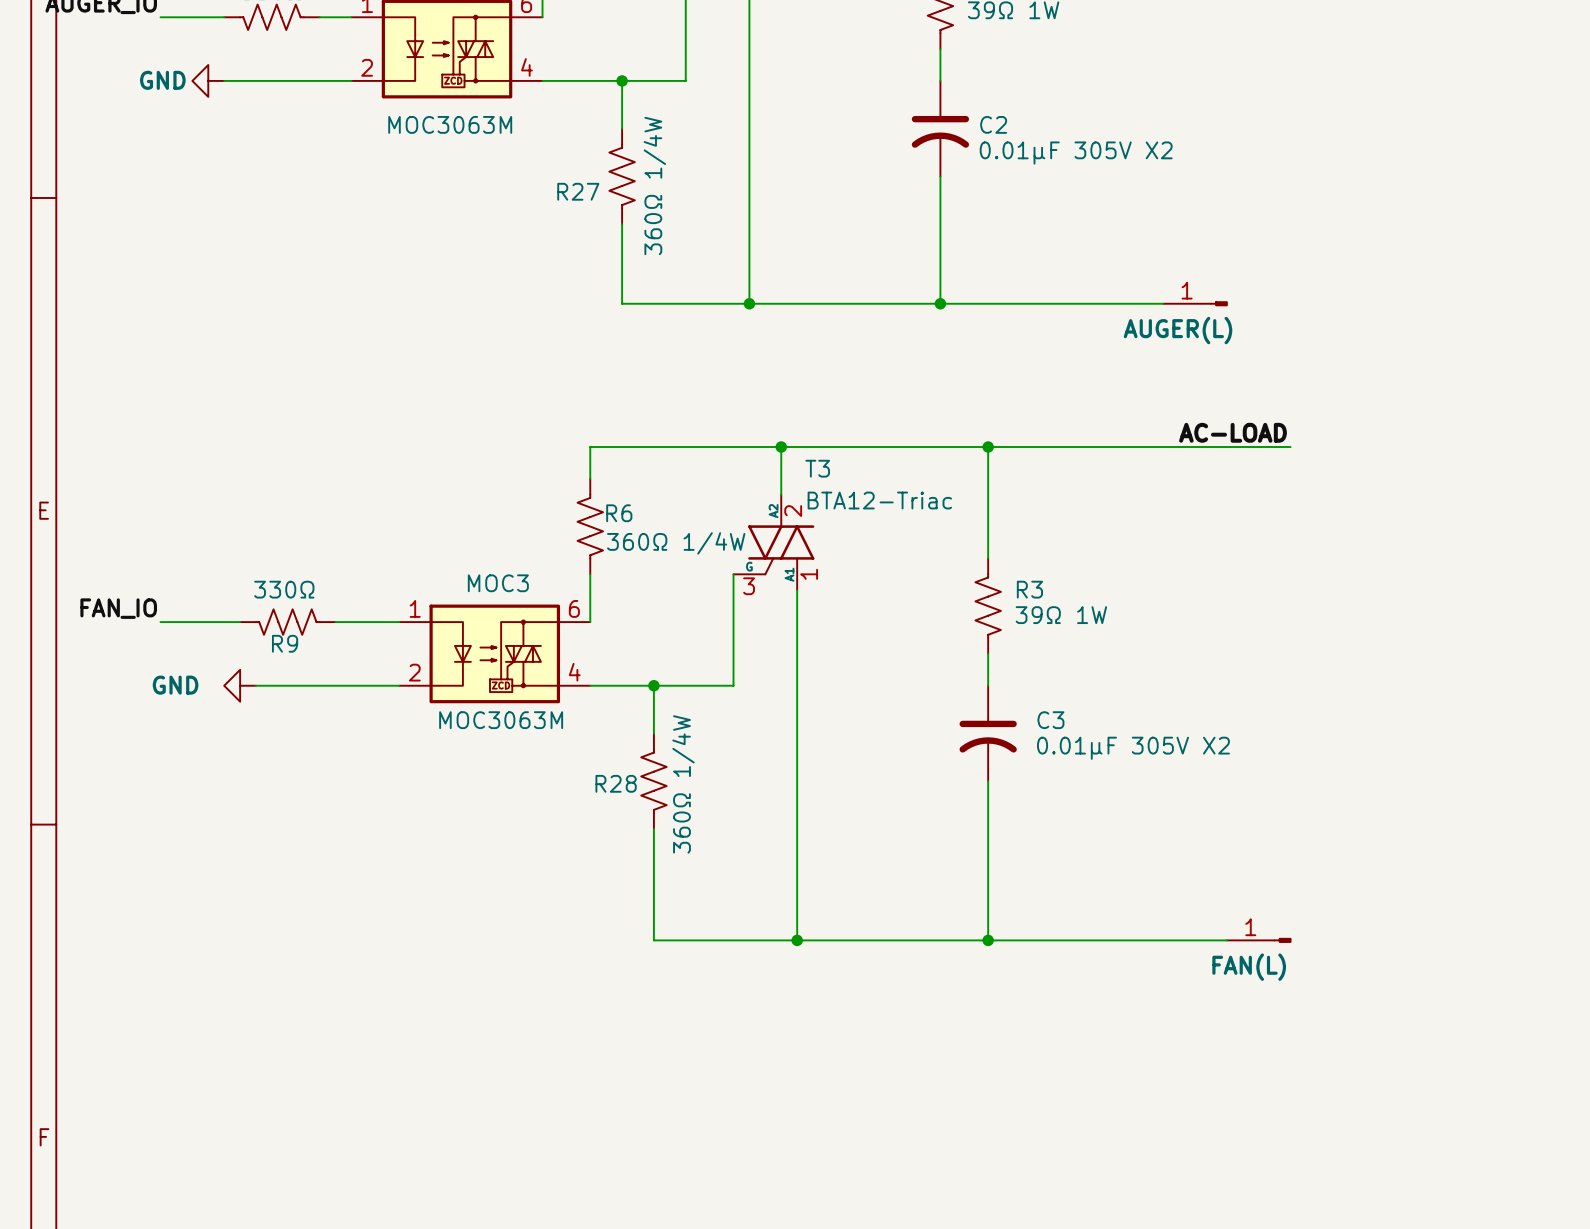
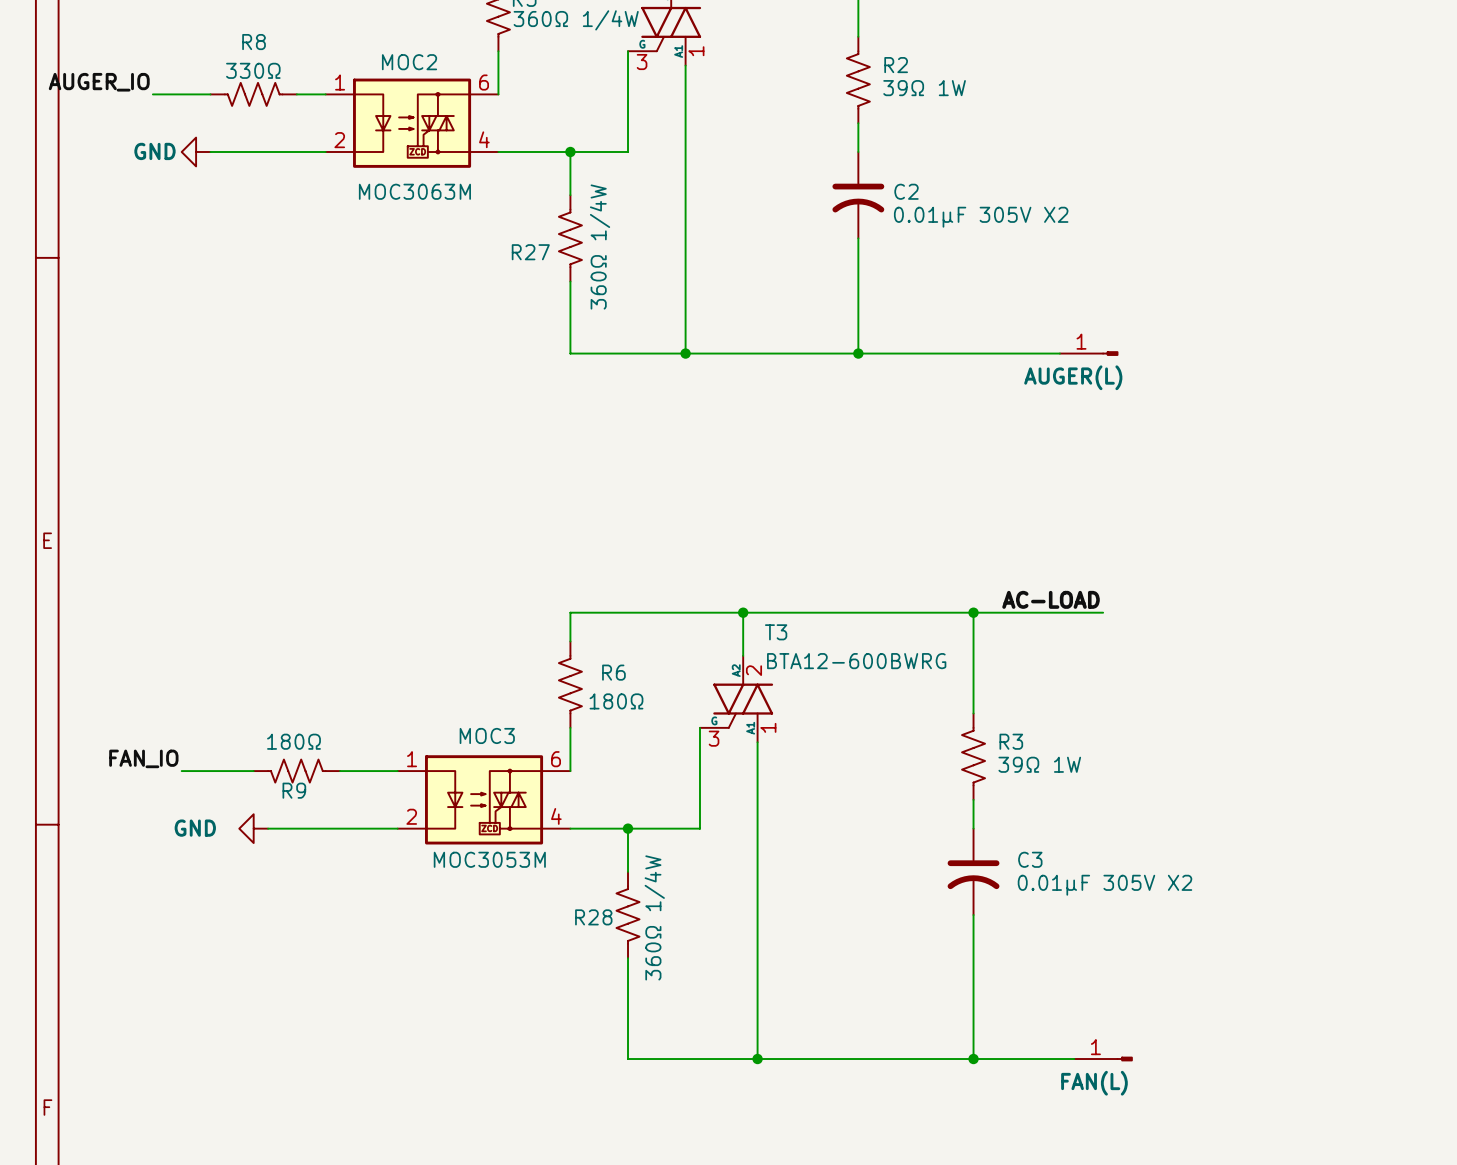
label position: AC-LOAD (1232, 432) -> AC-LOAD (1051, 599)
wire: (781, 447) (781, 494) -> (743, 612) (743, 655)
junction: (781, 447) -> none
wire: (988, 447) (988, 558) -> (973, 612) (973, 713)
junction: (988, 447) -> none
wire: (1290, 447) (590, 447) (590, 478) -> none
T3 value: BTA12-Triac (879, 500) -> BTA12-600BWRG (856, 661)
R6 name position: R6 (619, 513) -> R6 (613, 672)
R6 position: (590, 526) -> (570, 684)
T3 position: (773, 542) -> (736, 699)
R6 value: 360Ω 1/4W (676, 543) -> 180Ω (616, 701)
wire: (590, 574) (590, 622) -> (570, 727) (570, 771)
wire: (733, 574) (733, 685) (590, 685) -> (699, 727) (699, 828) (570, 828)
R9 value: 330Ω (284, 589) -> 180Ω (293, 741)
wire: (797, 590) (797, 940) -> (757, 742) (757, 1059)
junction: none -> (743, 612)
junction: none -> (973, 612)
wire: none -> (1103, 612) (570, 612) (570, 641)
R3 position: (988, 606) -> (973, 756)
label position: FAN_IO (118, 608) -> FAN_IO (143, 758)
wire: (160, 622) (240, 622) -> (181, 771) (253, 771)
R9 position: (287, 622) -> (296, 771)
wire: (335, 622) (399, 622) -> (340, 771) (397, 771)
MOC3 position: (494, 653) -> (484, 799)
wire: (988, 653) (988, 685) -> (973, 799) (973, 828)
power symbol position: GND (240, 685) -> GND (253, 828)
wire: (256, 685) (399, 685) -> (268, 828) (397, 828)
wire: (653, 685) (653, 733) -> (628, 828) (628, 871)
junction: (653, 685) -> none
MOC3 value: MOC3063M (501, 720) -> MOC3053M (489, 859)
C3 position: (988, 733) -> (973, 871)
R28 position: (653, 781) -> (628, 915)
wire: (988, 781) (988, 940) -> (973, 915) (973, 1059)
wire: (653, 828) (653, 940) (1226, 940) -> none
junction: none -> (628, 828)
junction: (797, 940) -> none
junction: (988, 940) -> none
part position: (1259, 940) -> (1103, 1059)
wire: none -> (628, 958) (628, 1059) (1074, 1059)
junction: none -> (757, 1059)
junction: none -> (973, 1059)

